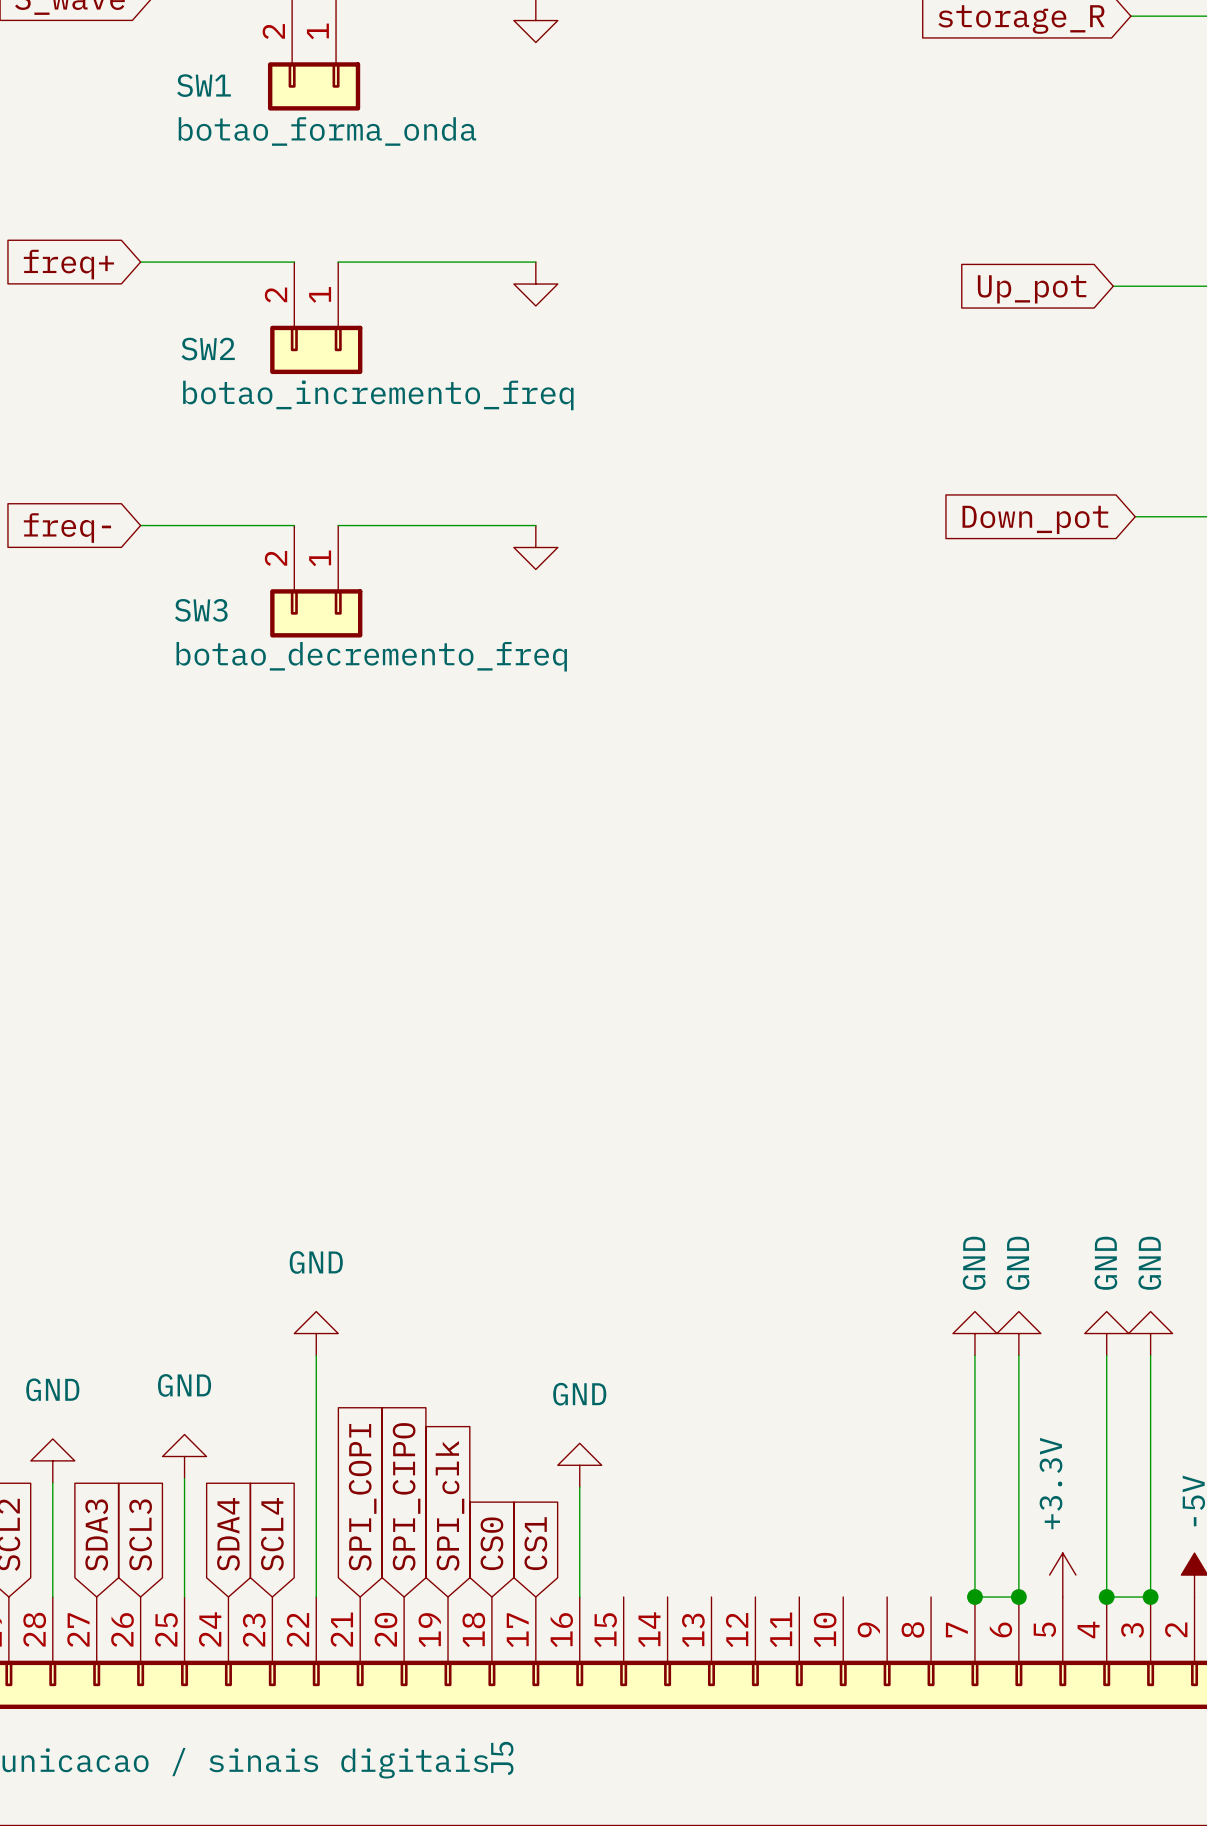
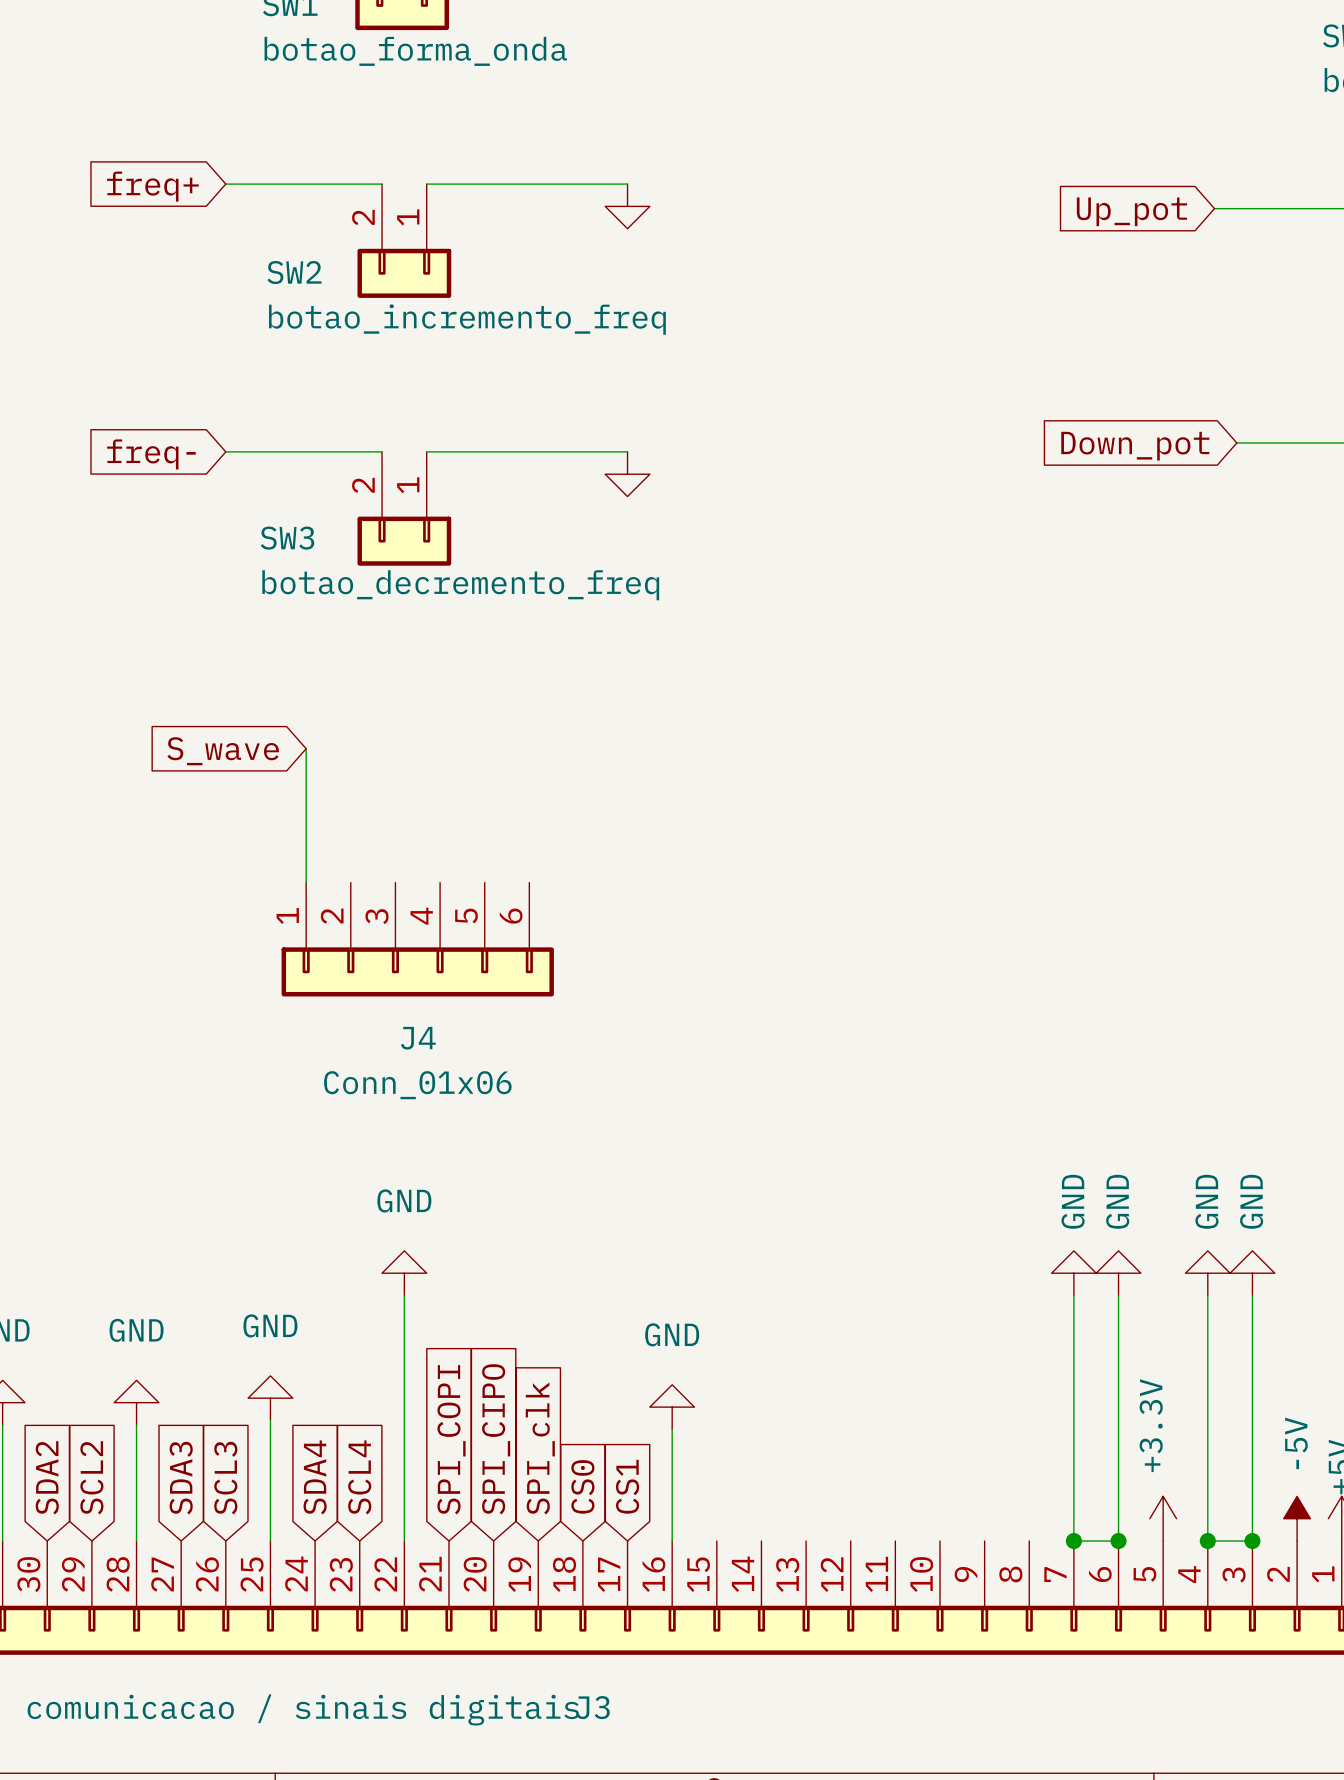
wire: none -> (306, 748) (306, 882)
global label: none -> S_wave (223, 751)
J4: none -> Conn_01x06 (417, 939)
J5 name: J5 (502, 1758) -> J3 (593, 1707)

